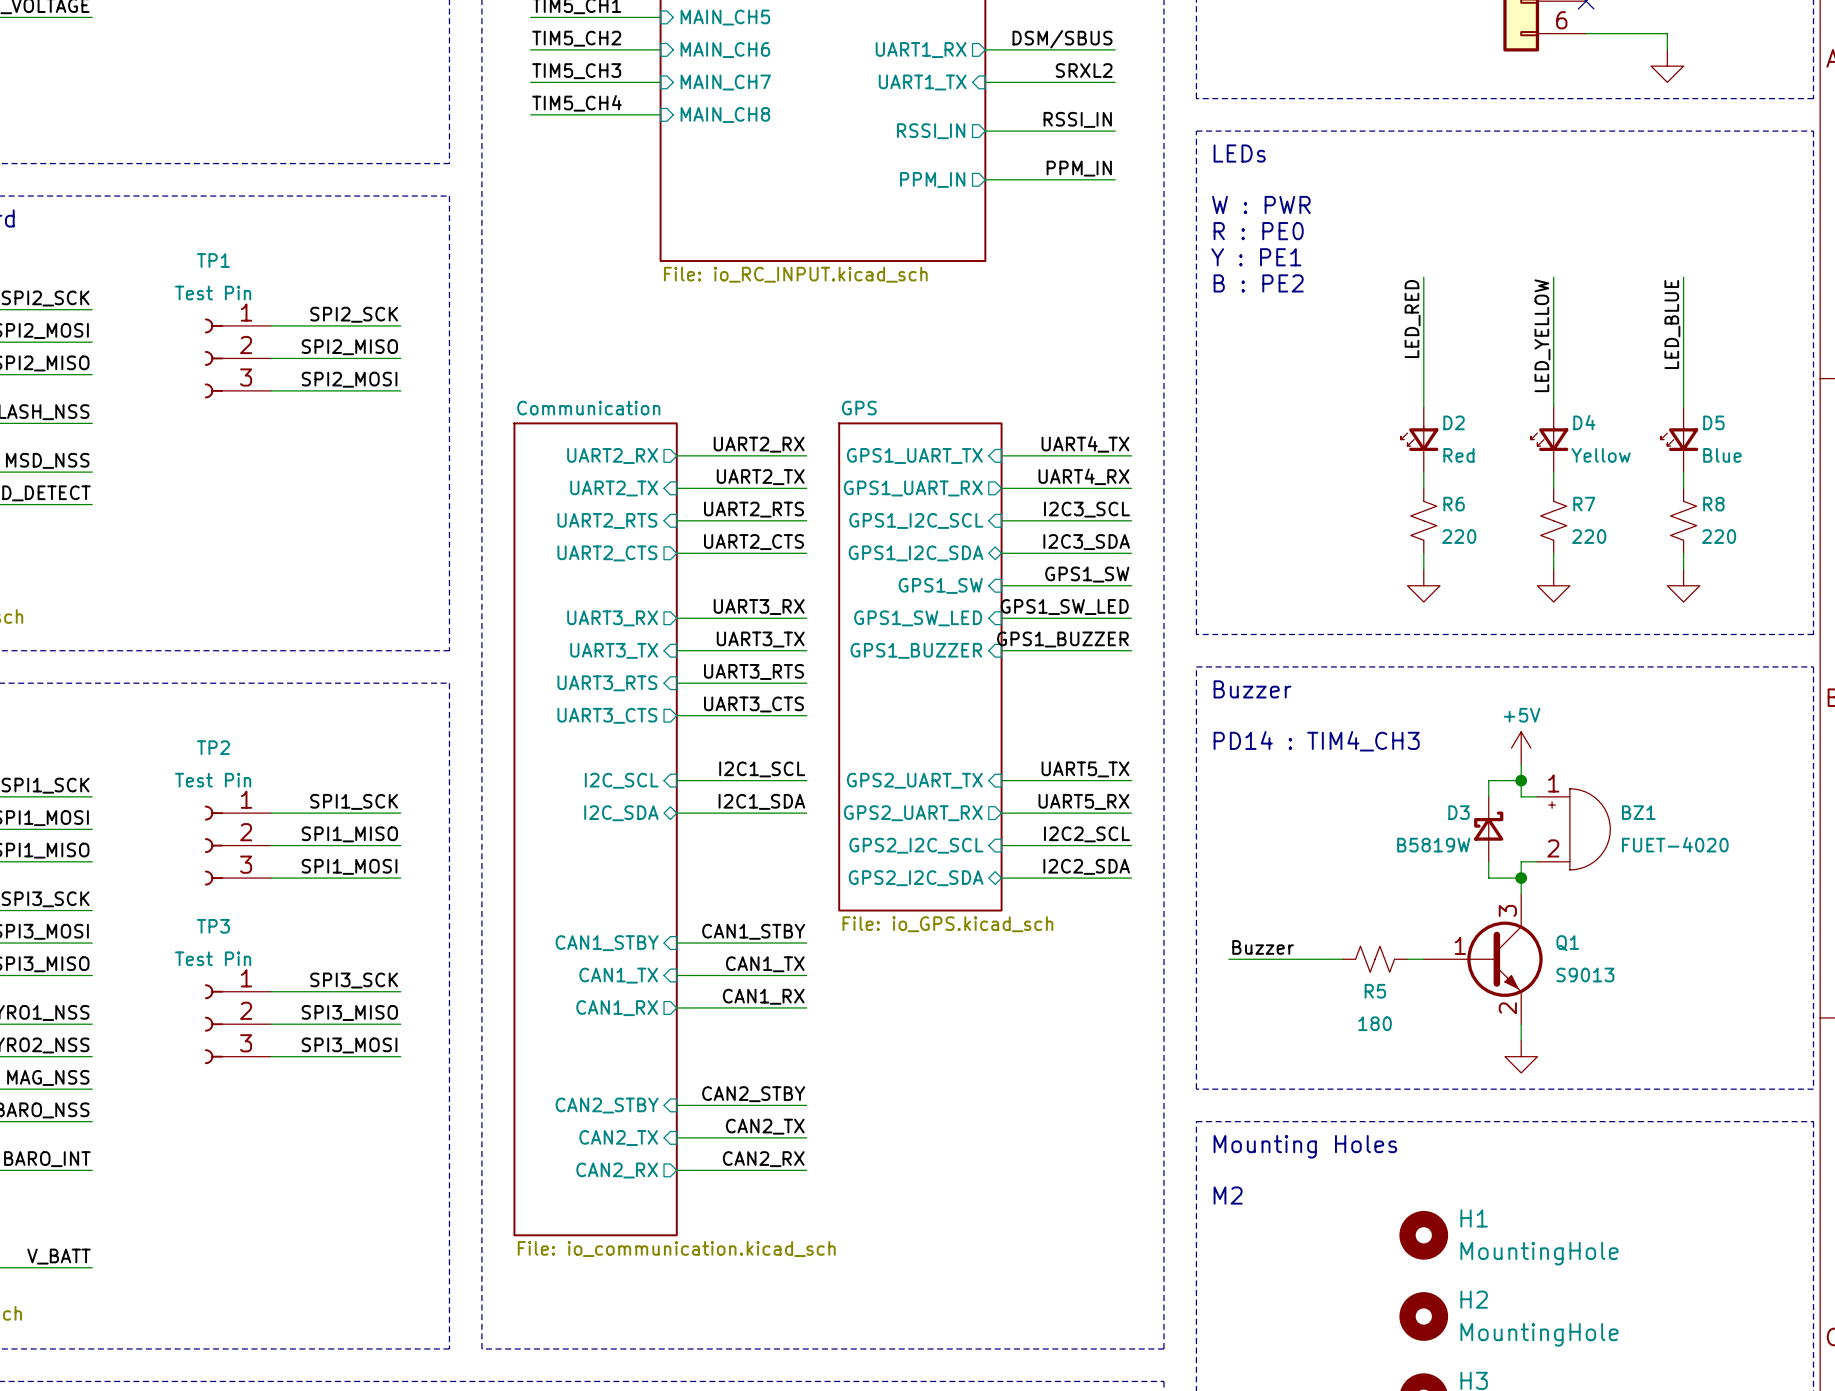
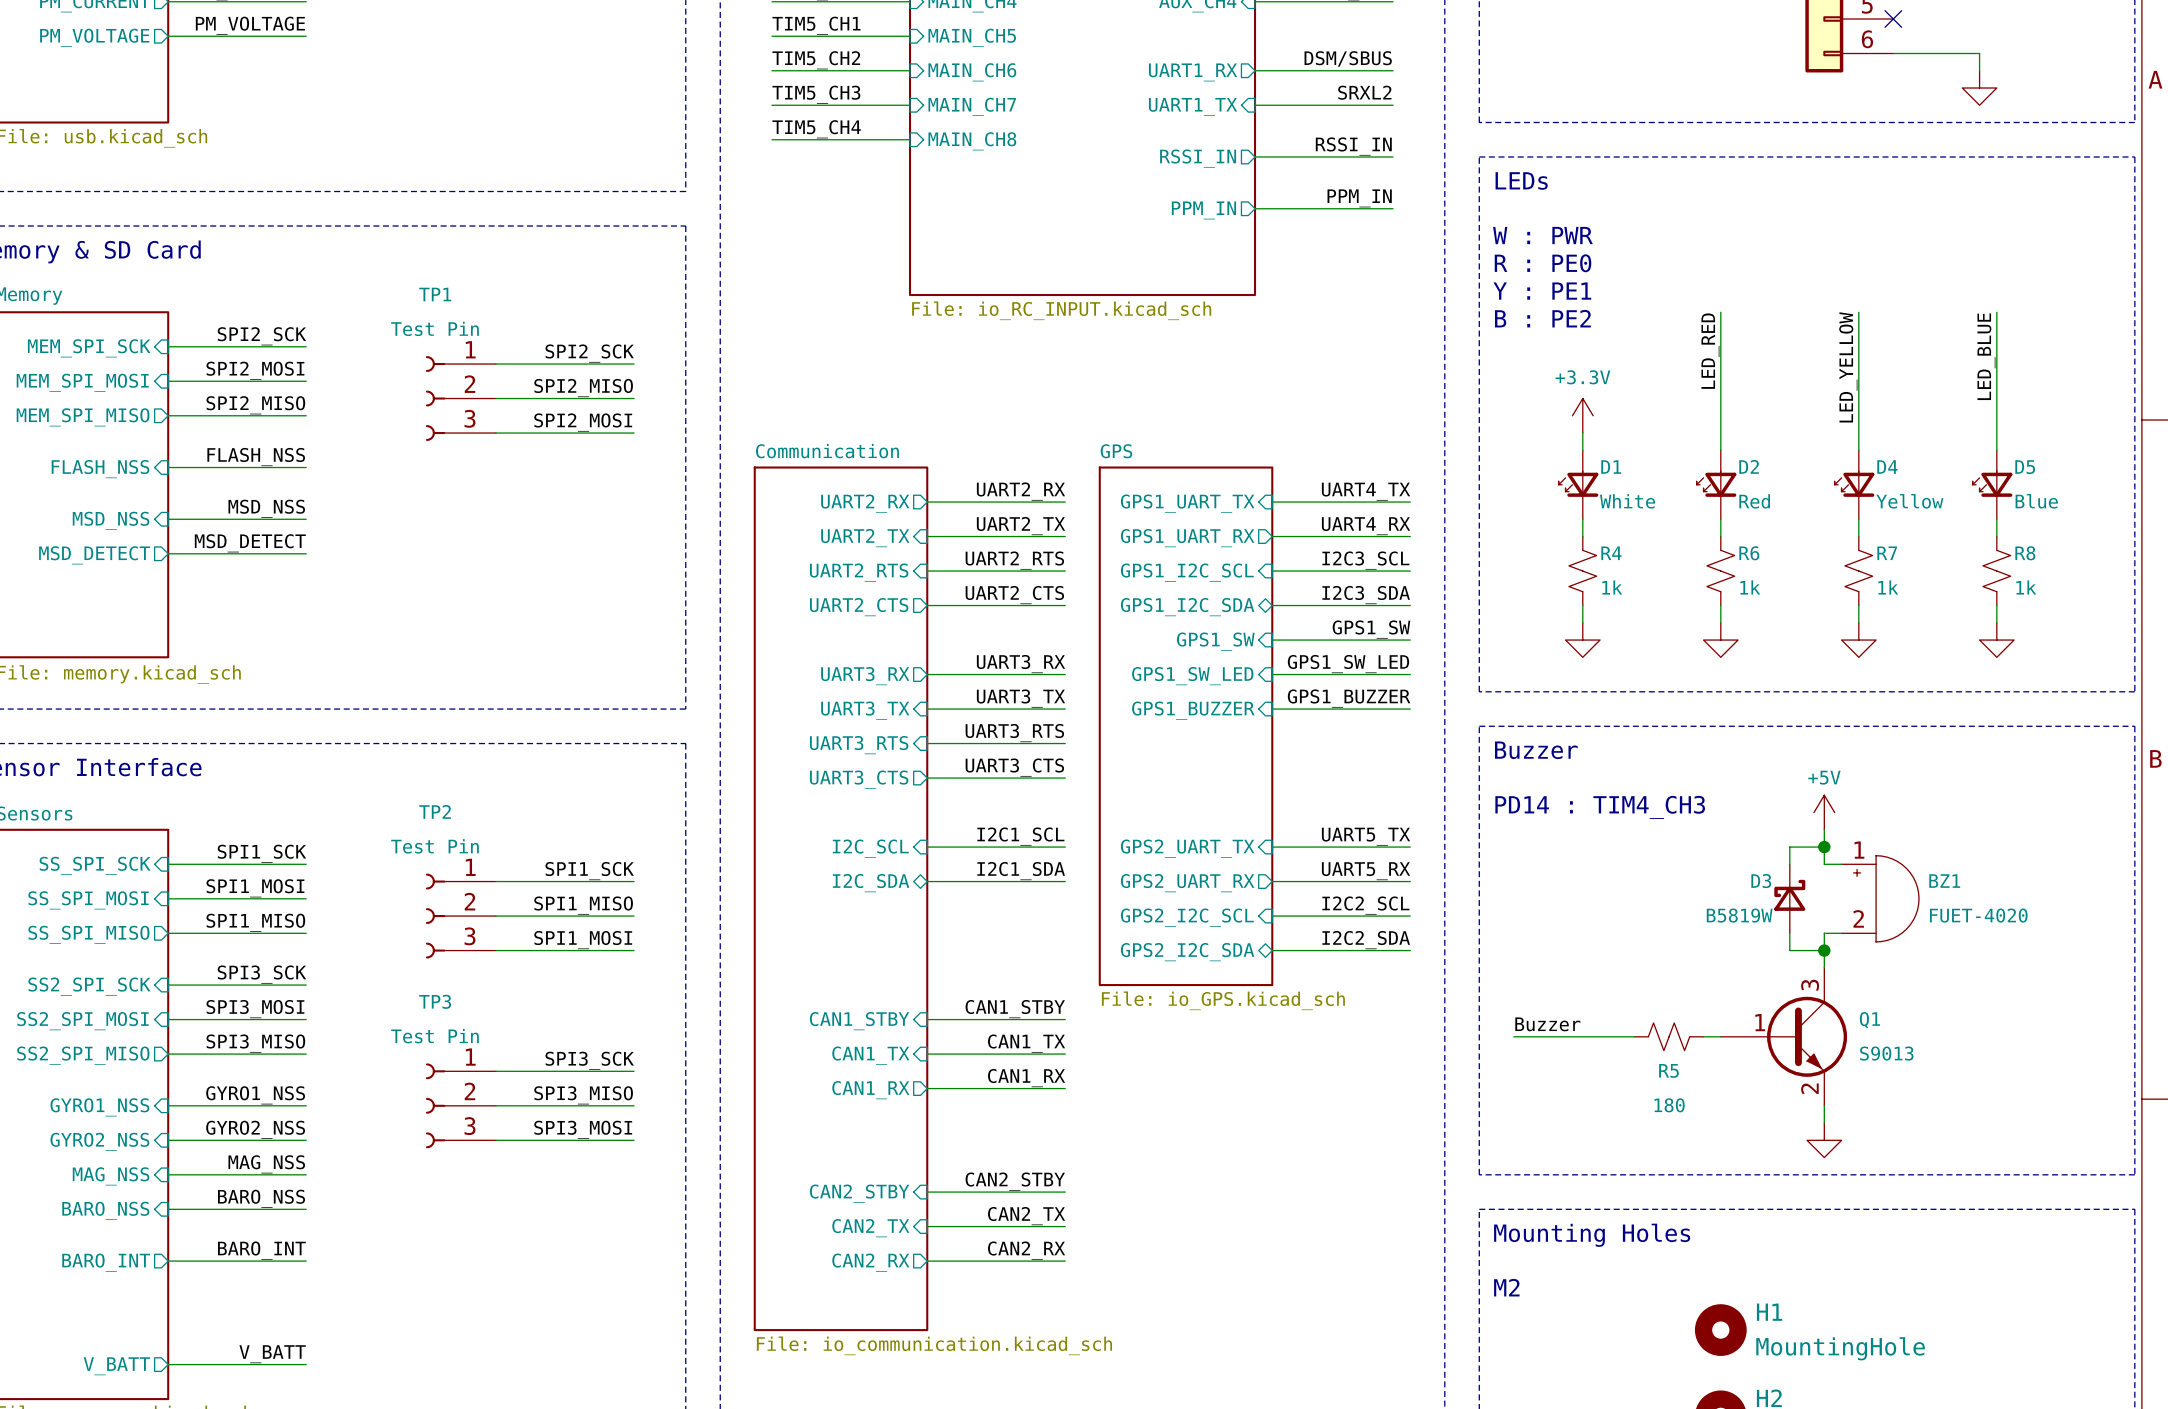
power symbol: none -> +3.3V (1582, 415)
wire: none -> (1582, 433) (1582, 450)
D1: none -> White (1578, 484)
wire: none -> (1582, 519) (1582, 536)
R4: none -> 1k (1582, 571)
R6 value: 220 (1459, 536) -> 1k (1750, 587)
R7 value: 220 (1589, 536) -> 1k (1888, 587)
R8 value: 220 (1719, 536) -> 1k (2026, 587)
wire: none -> (1582, 605) (1582, 622)
power symbol: none -> (1582, 640)

